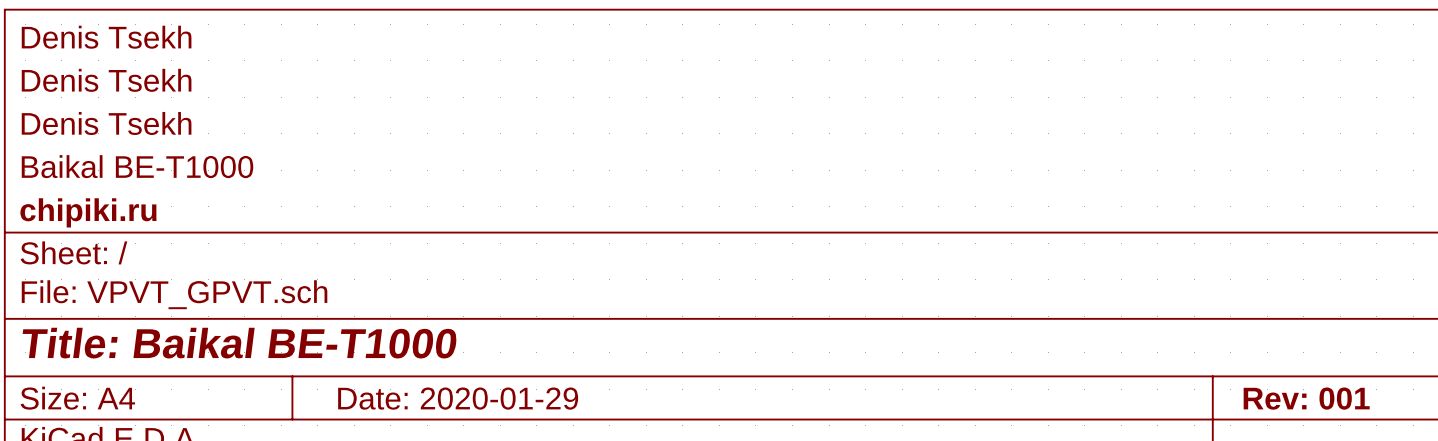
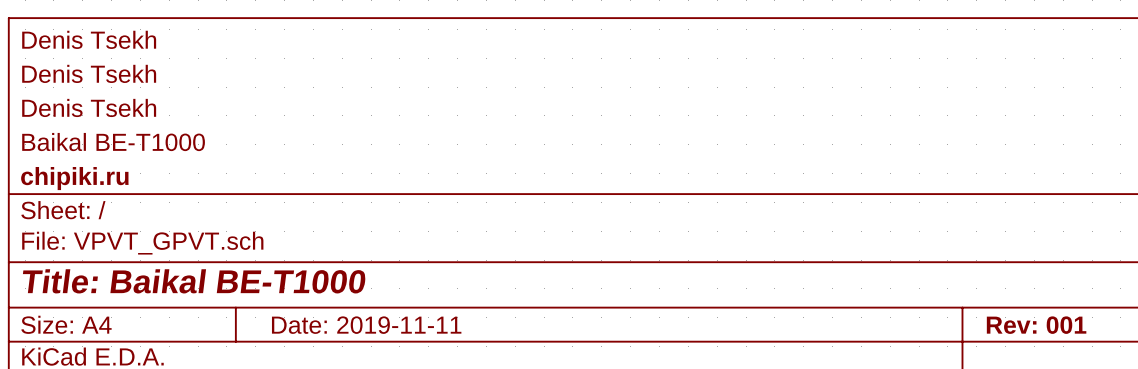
title block: Date: 2020-01-29 (458, 398) -> Date: 2019-11-11 (366, 325)

